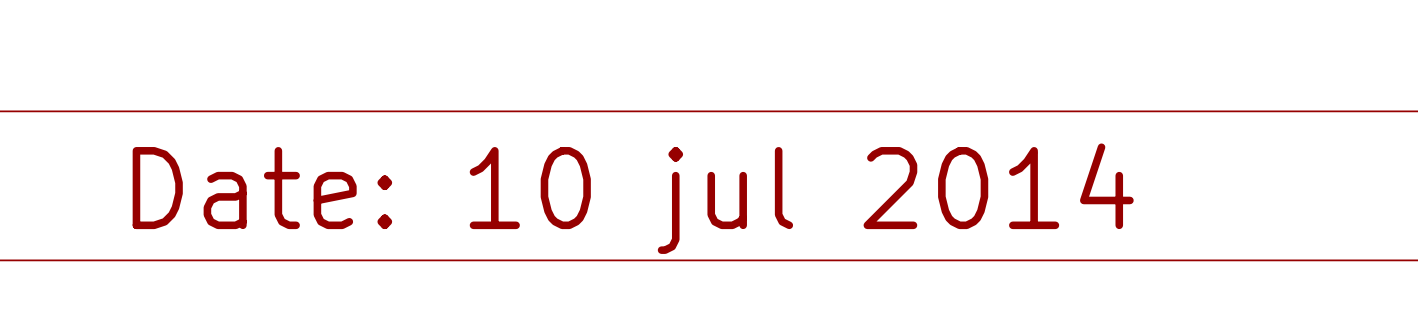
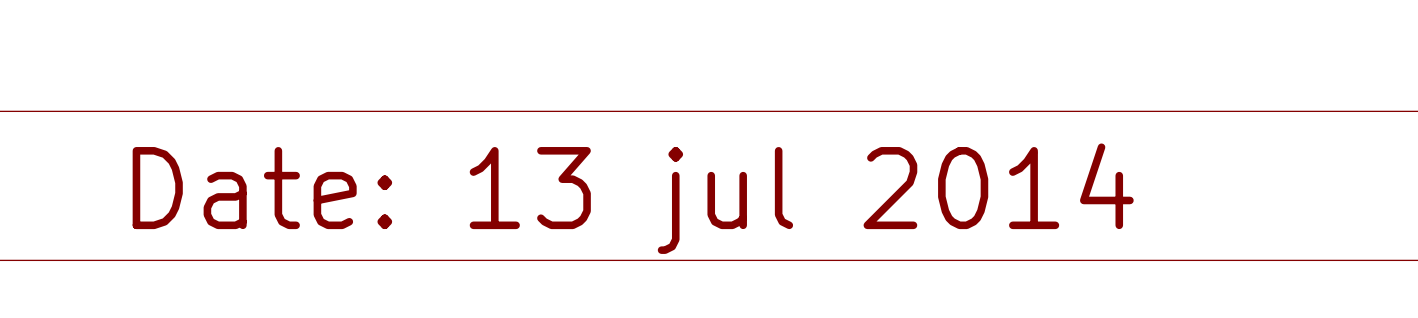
title block: Date: 10 jul 2014 (633, 198) -> Date: 13 jul 2014 (633, 198)

